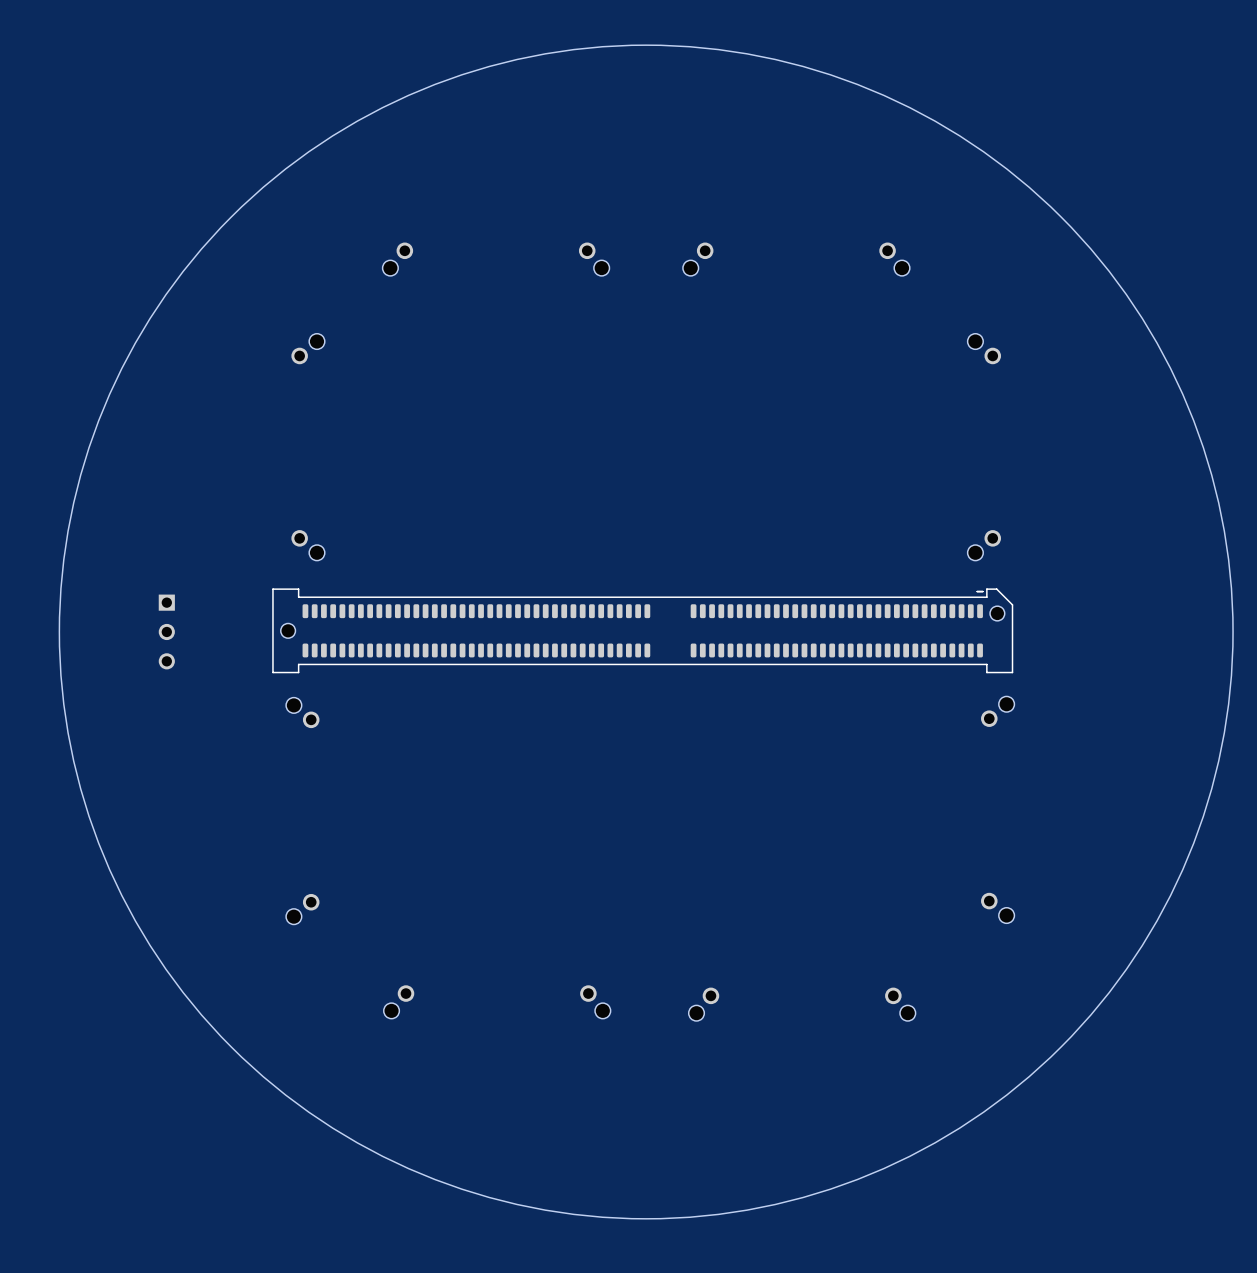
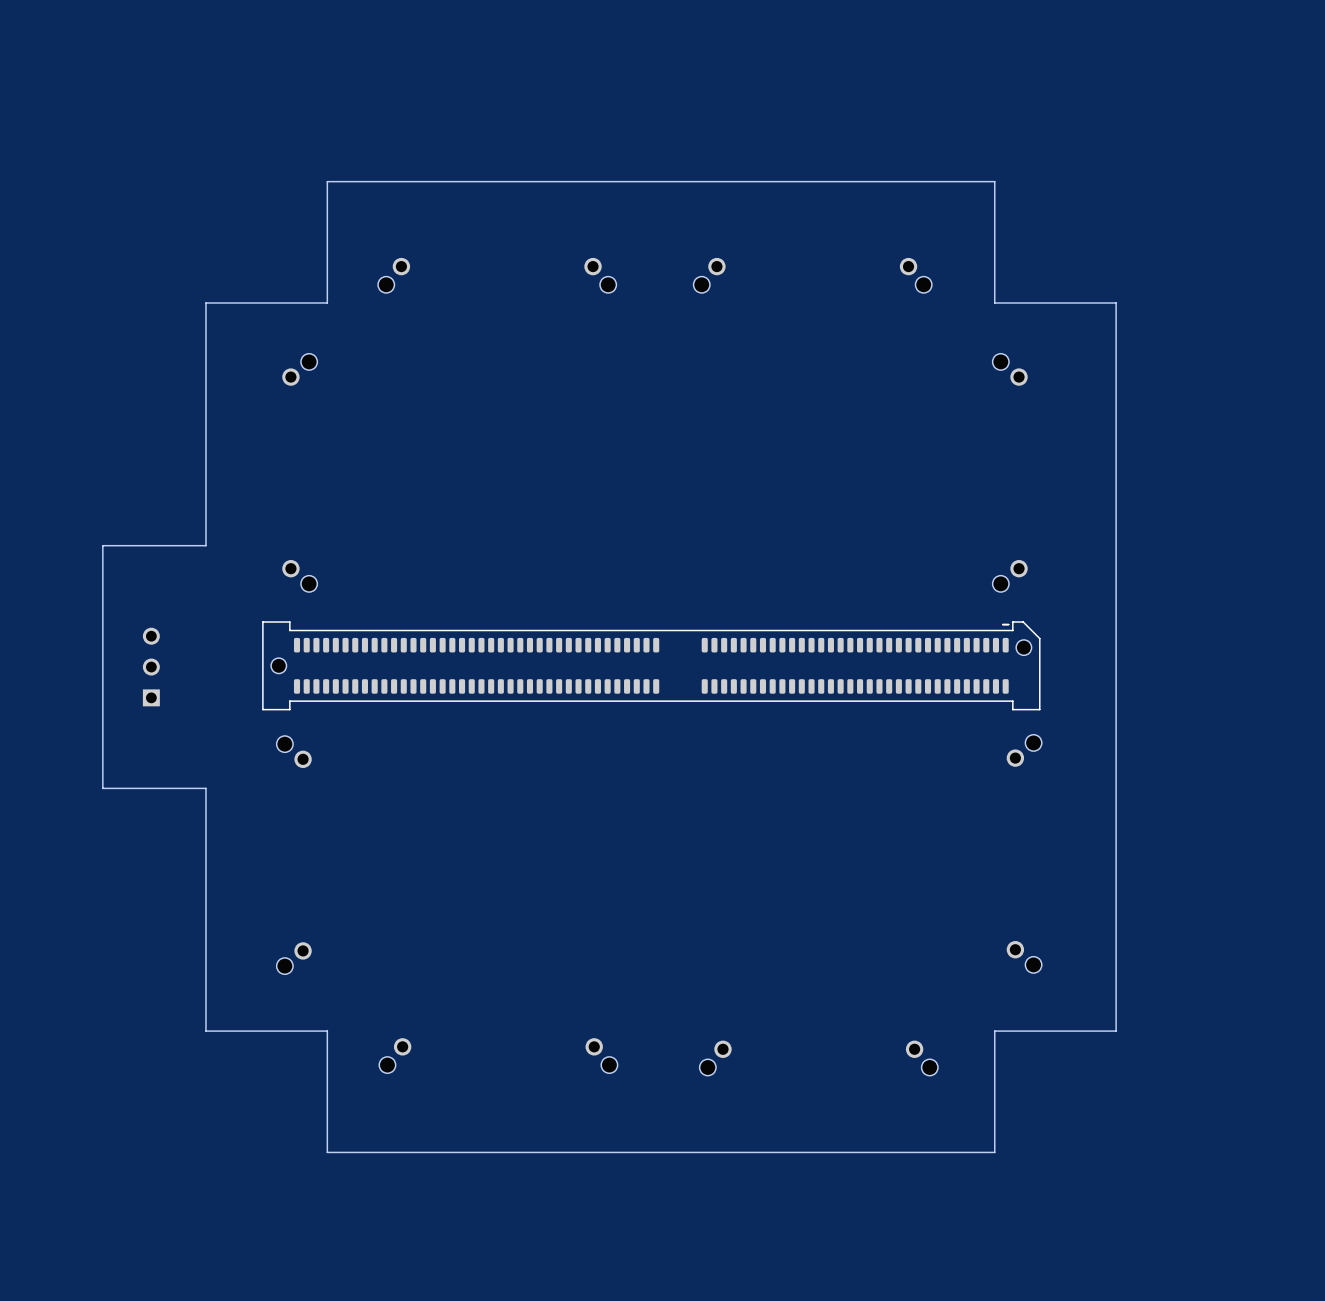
round board edge: [59, 44, 1234, 1220] -> none
board edge: none -> (994, 181) (994, 302) (1116, 302) (1116, 1031) (994, 1031) (994, 1152) (327, 1152) (327, 1031) (205, 1031) (205, 788) (102, 788) (102, 545) (205, 545) (205, 302) (327, 302) (327, 181) (994, 181)
part rotation: 0° (166, 631) -> 180° (151, 667)

